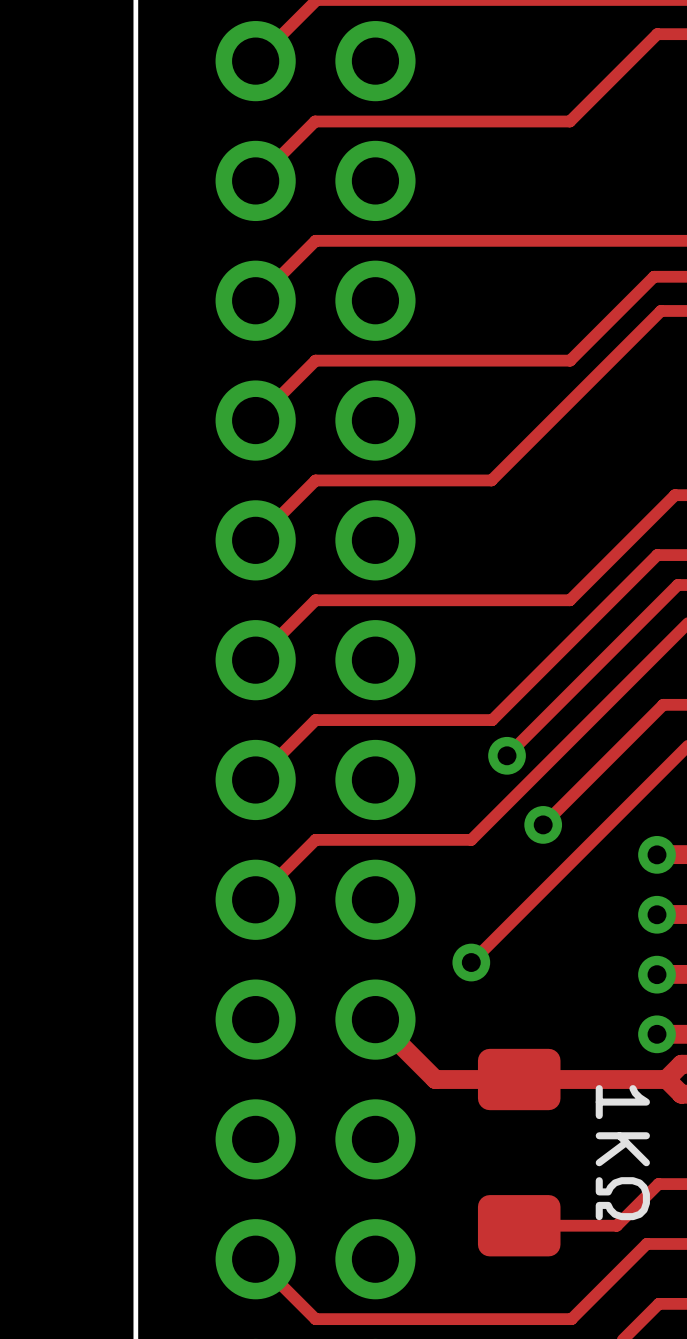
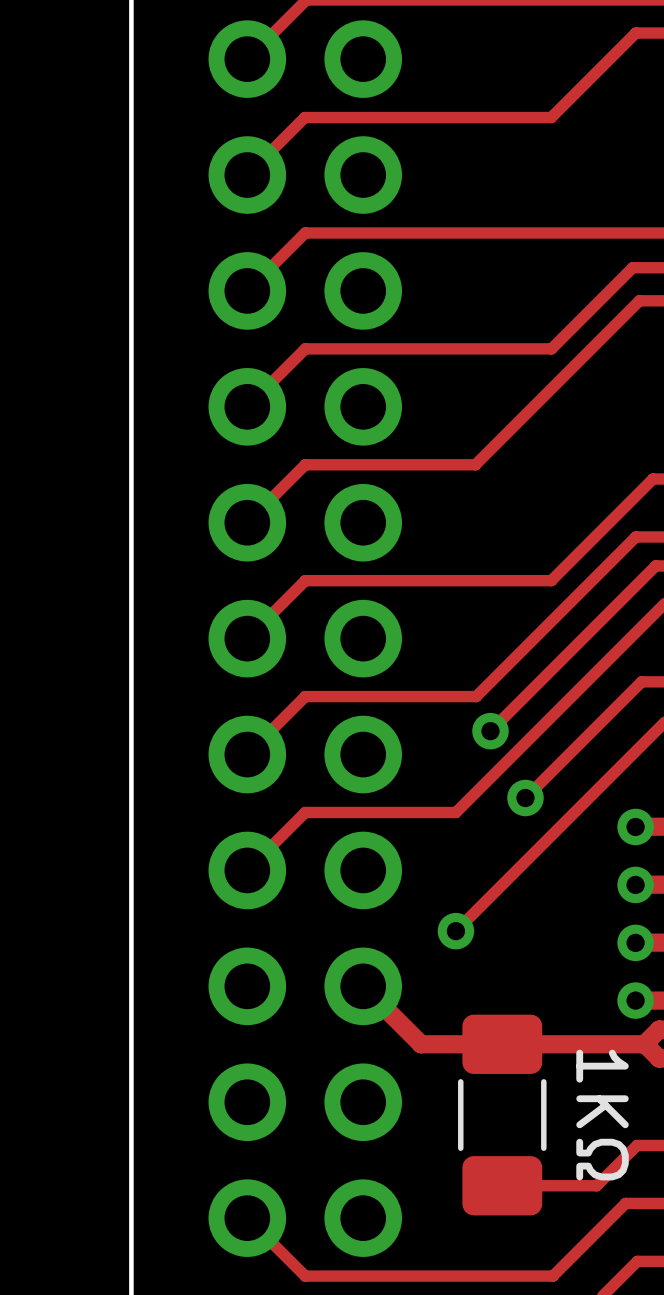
1KΩ footprint: [477, 1048, 561, 1257] -> [458, 1014, 547, 1216]

